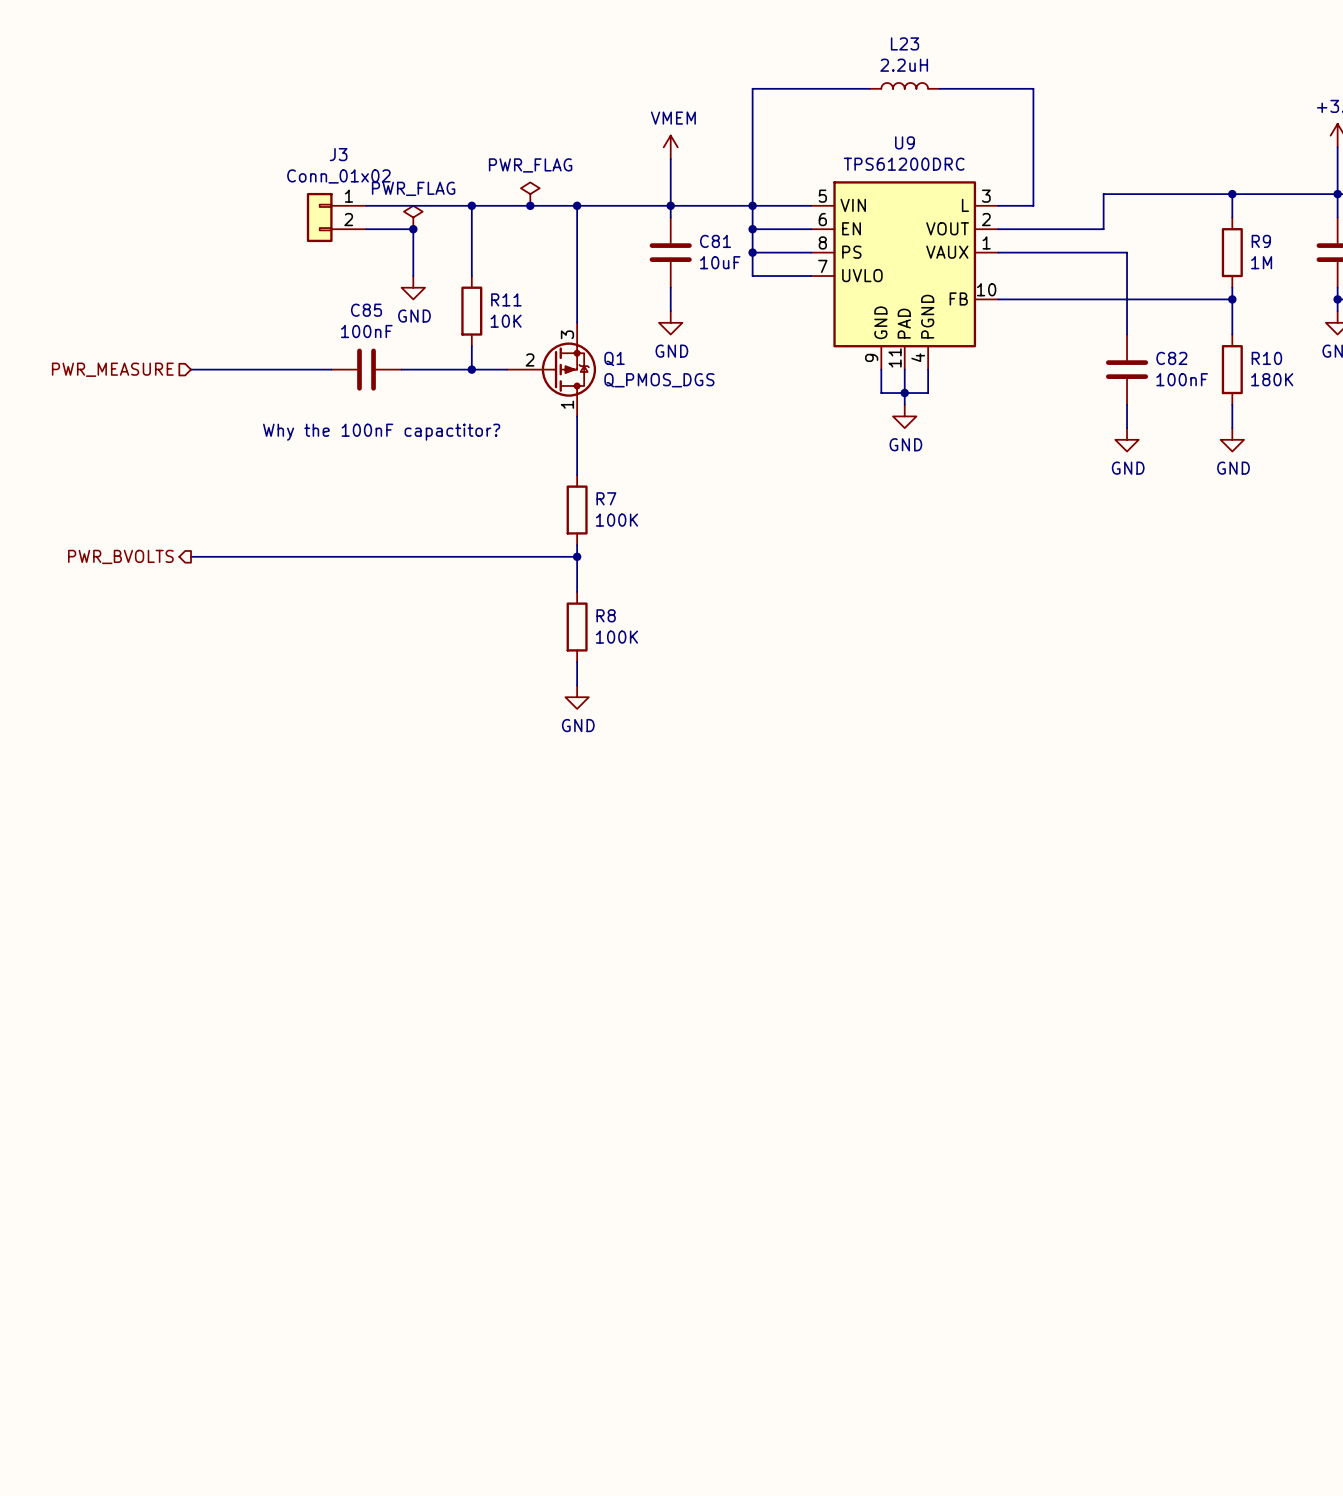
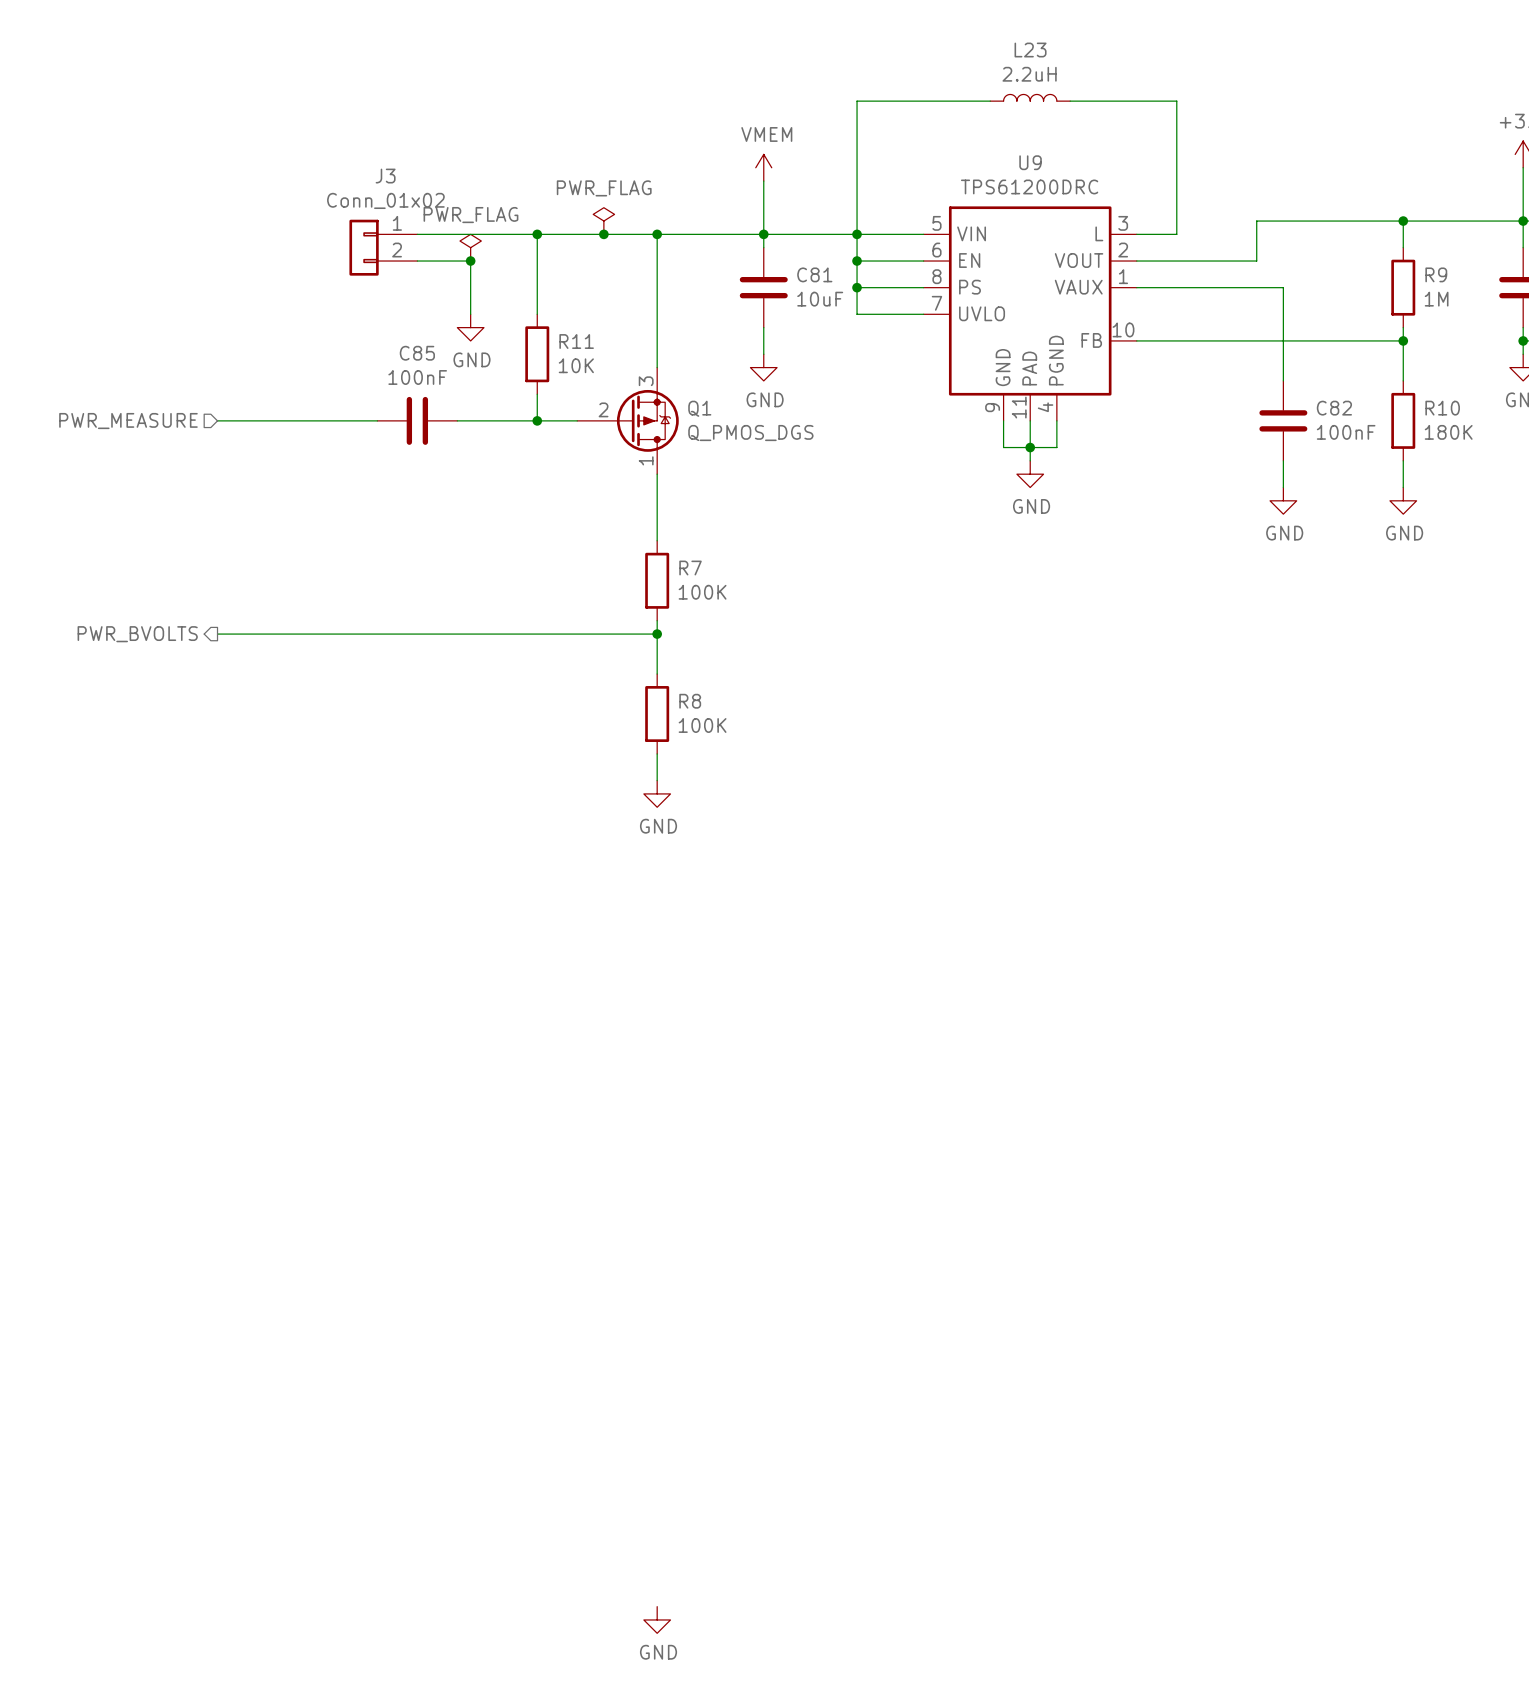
text: Why the 100nF capactitor? (381, 432) -> none
power symbol: none -> GND (657, 1619)

